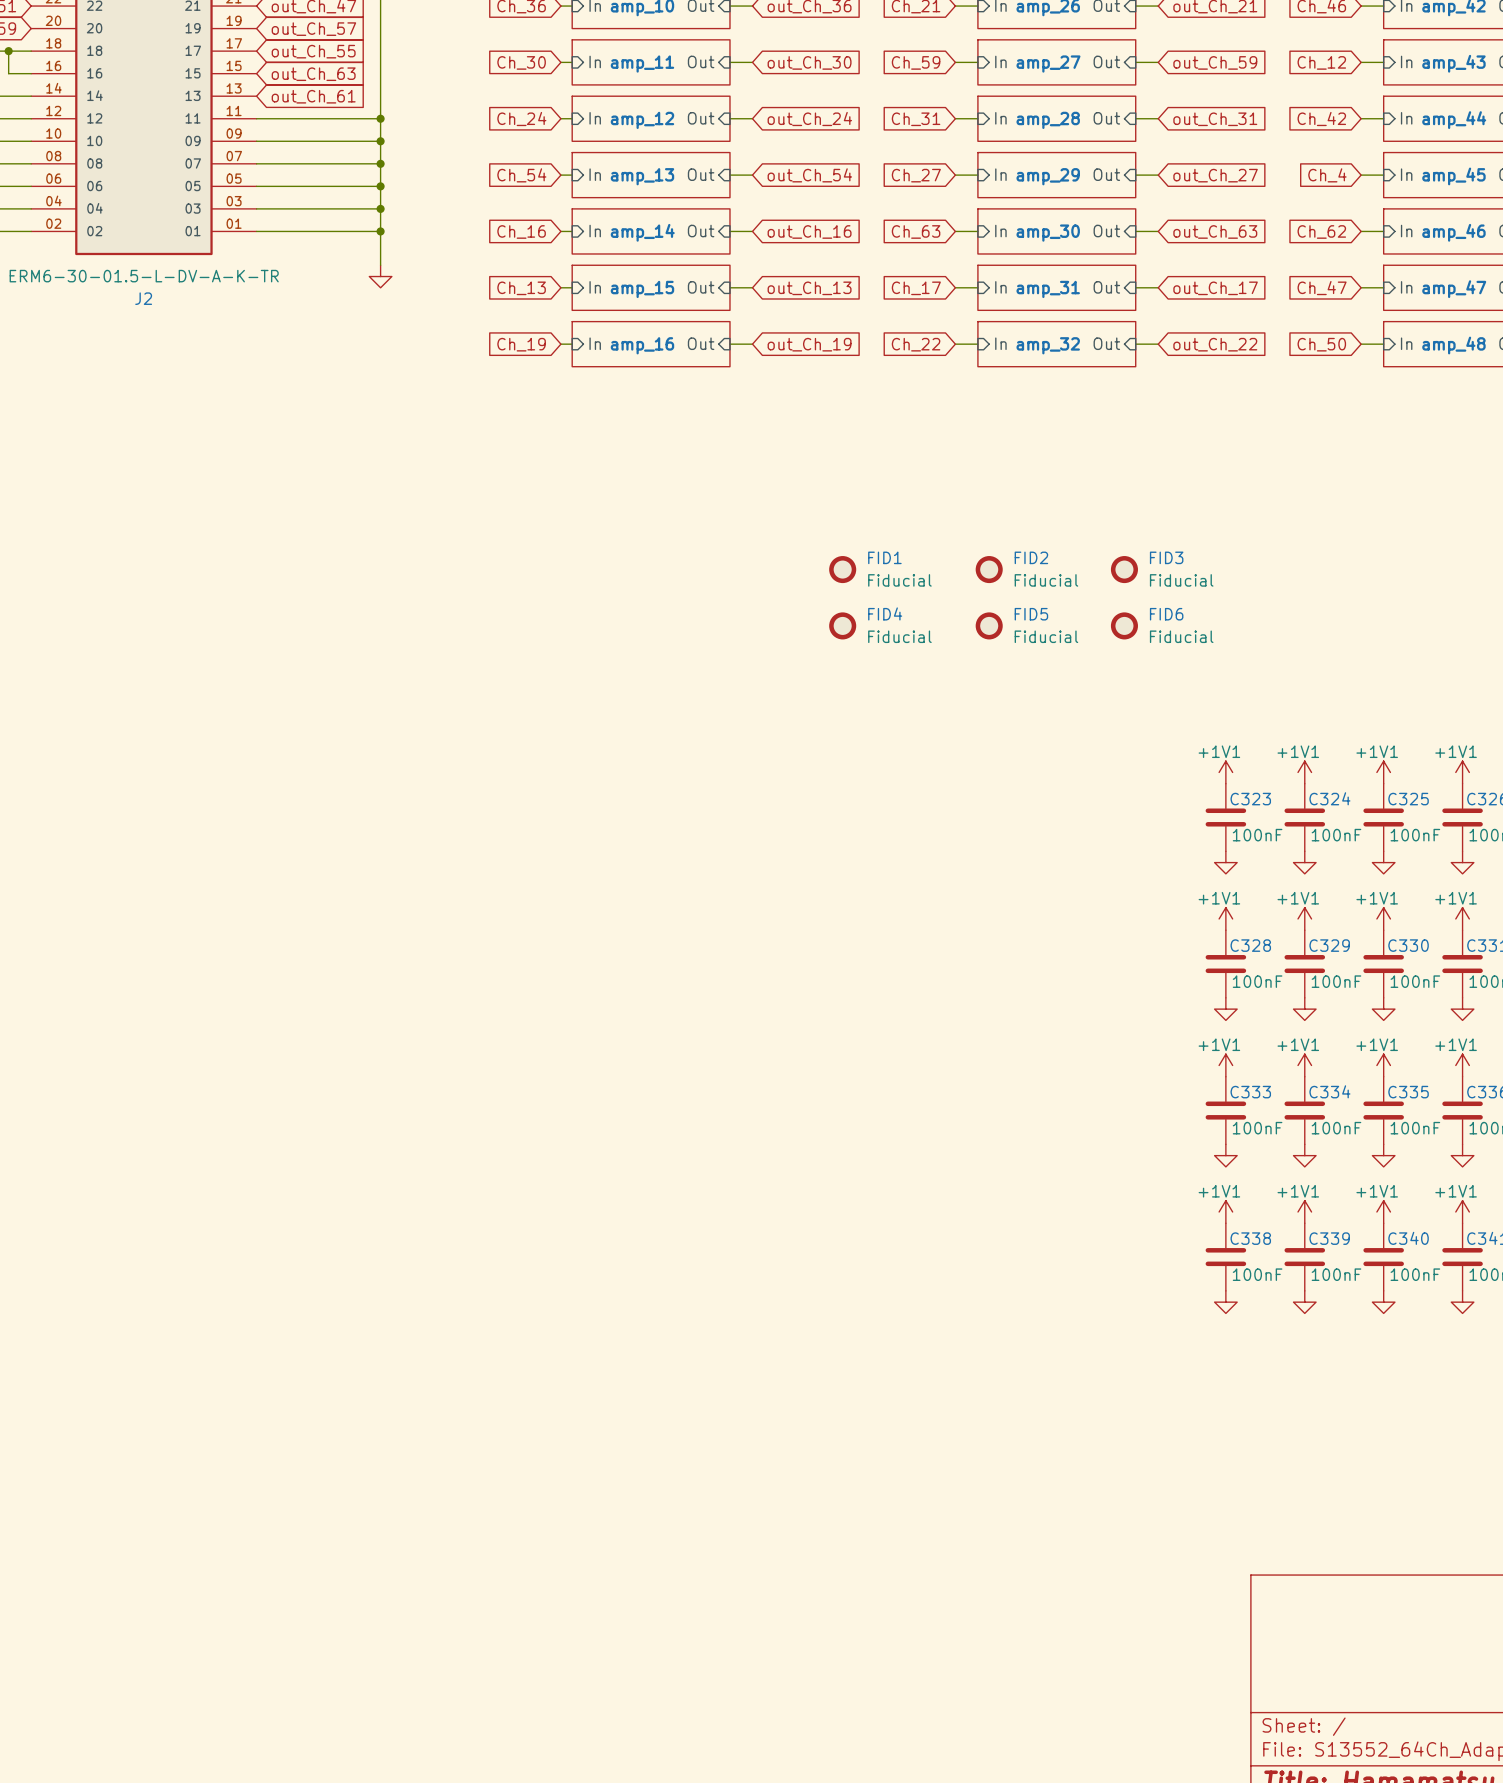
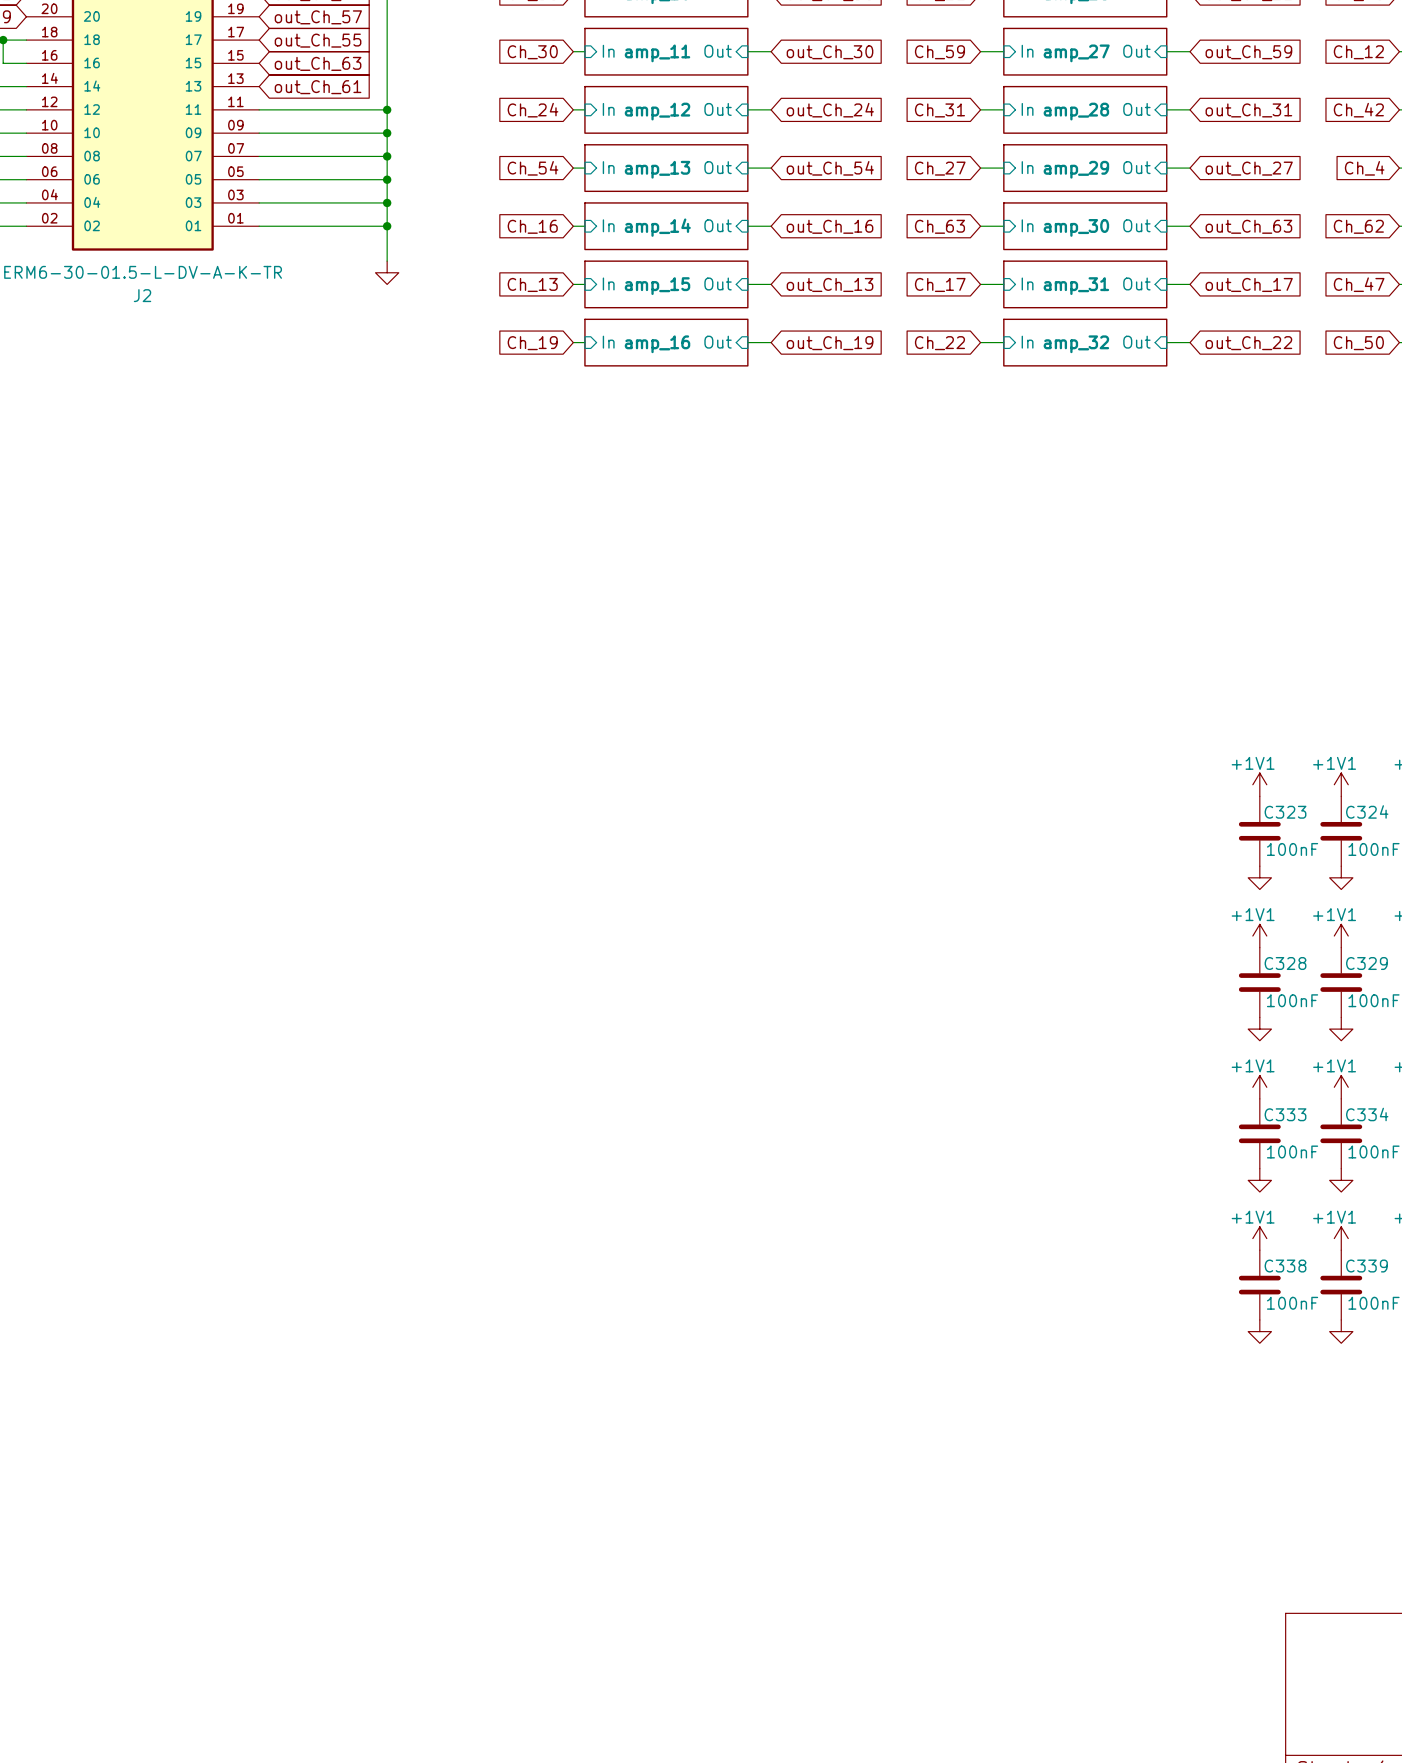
FID1: Fiducial (842, 569) -> none
FID2: Fiducial (989, 569) -> none
FID3: Fiducial (1124, 569) -> none
FID4: Fiducial (842, 625) -> none
FID5: Fiducial (989, 625) -> none
FID6: Fiducial (1124, 625) -> none

